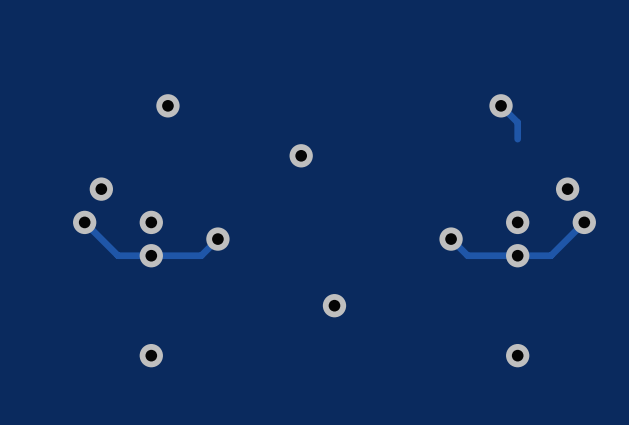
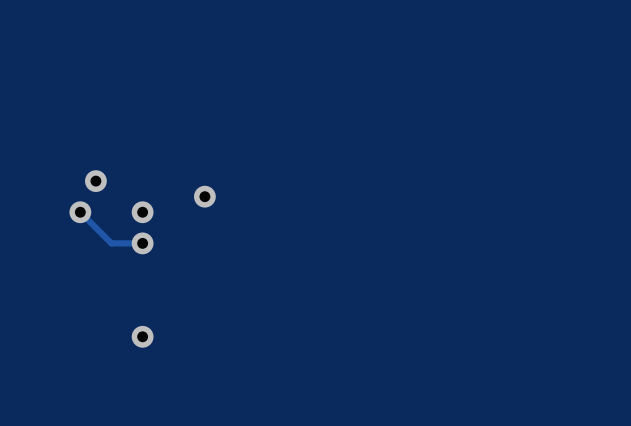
via: (167, 105) -> none
track: (501, 105) (517, 122) (517, 139) -> none
via: (501, 105) -> none
via: (301, 155) -> none
via: (567, 189) -> none
via: (517, 222) -> none
track: (584, 222) (550, 255) (467, 255) (451, 239) -> none
via: (584, 222) -> none
track: (217, 239) (201, 255) (151, 255) -> none
via position: (217, 239) -> (204, 196)
via: (451, 239) -> none
via: (517, 255) -> none
via: (334, 305) -> none
via: (517, 355) -> none

